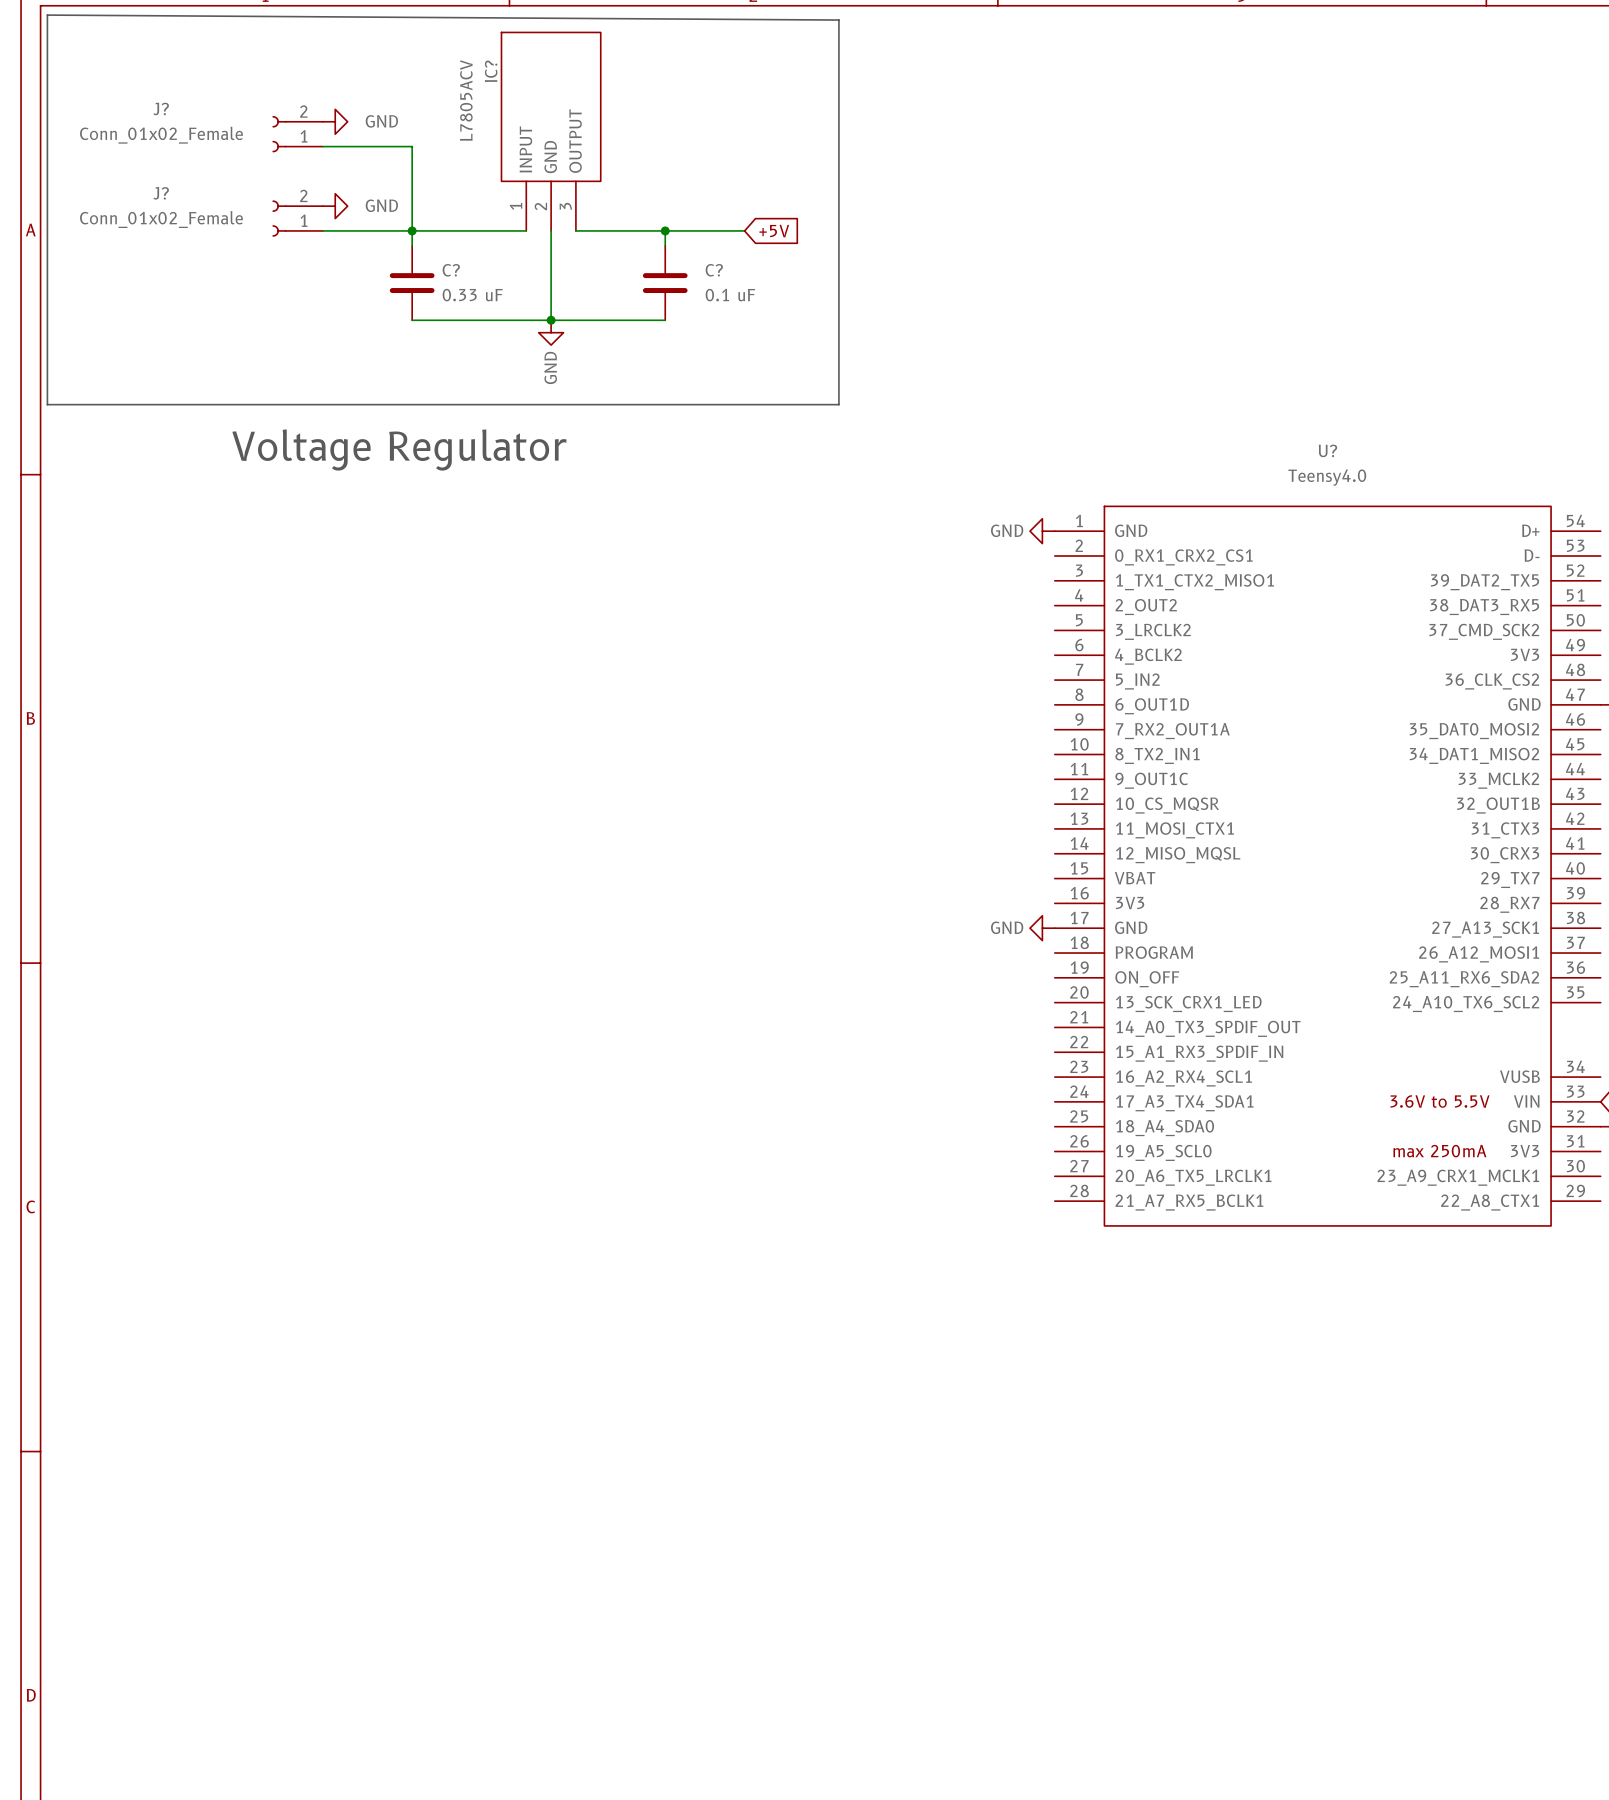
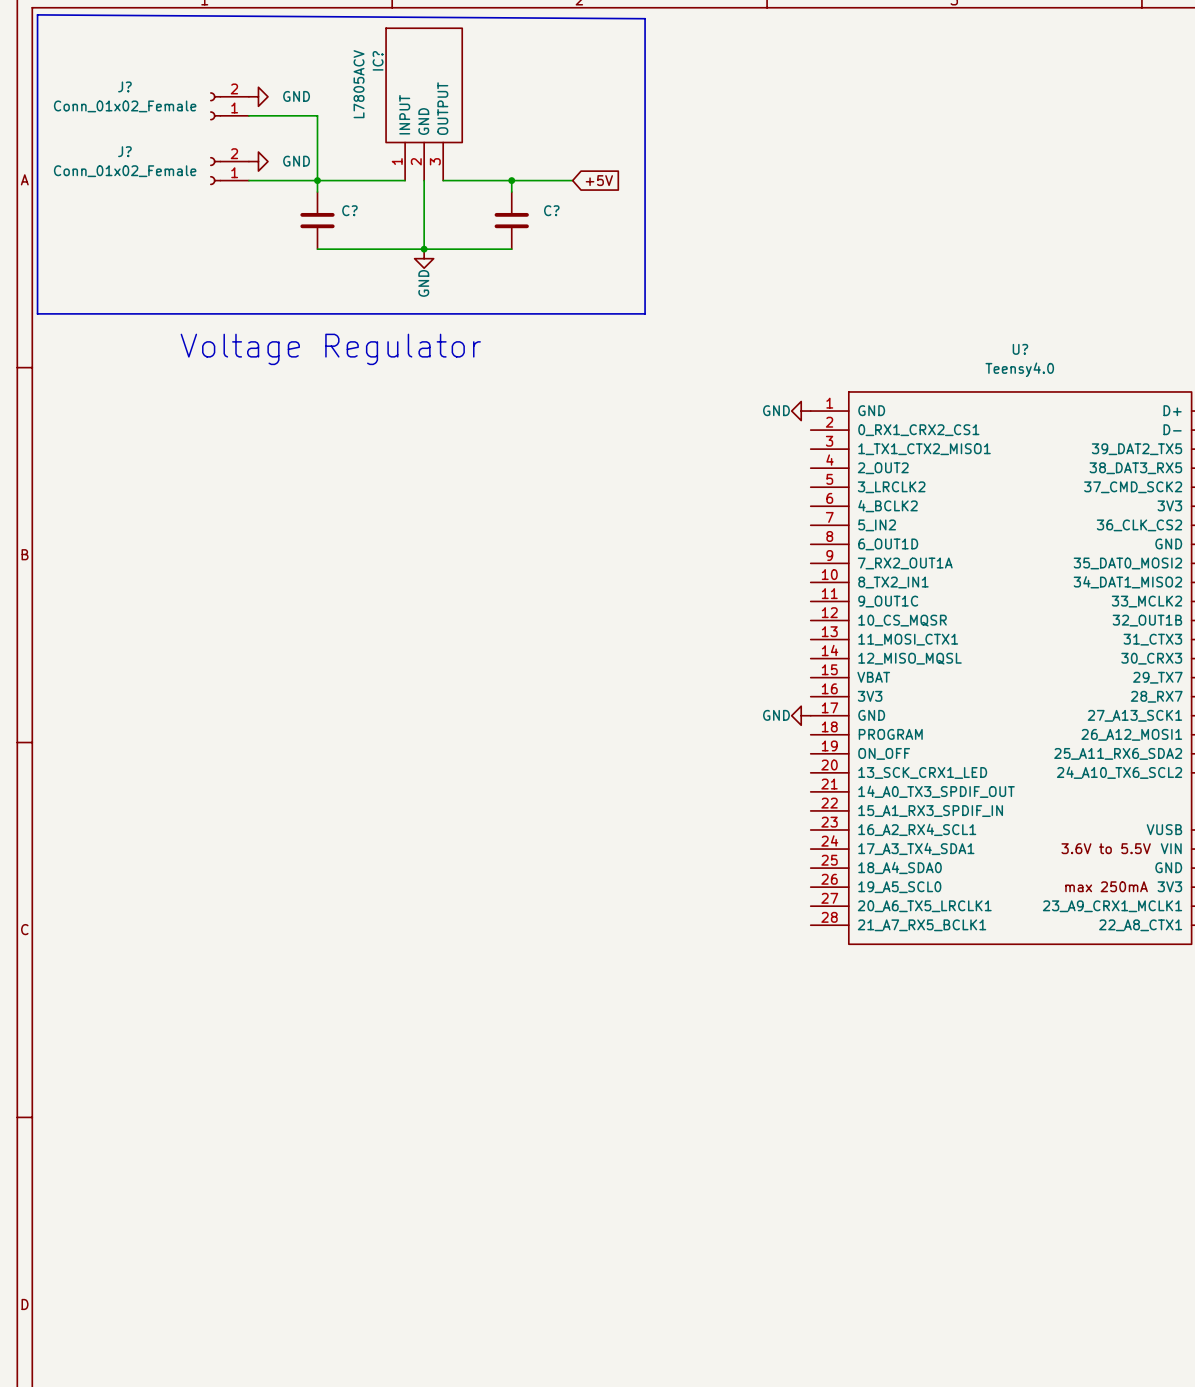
C? value: 0.33 uF (472, 295) -> none
C? value: 0.1 uF (730, 295) -> none

